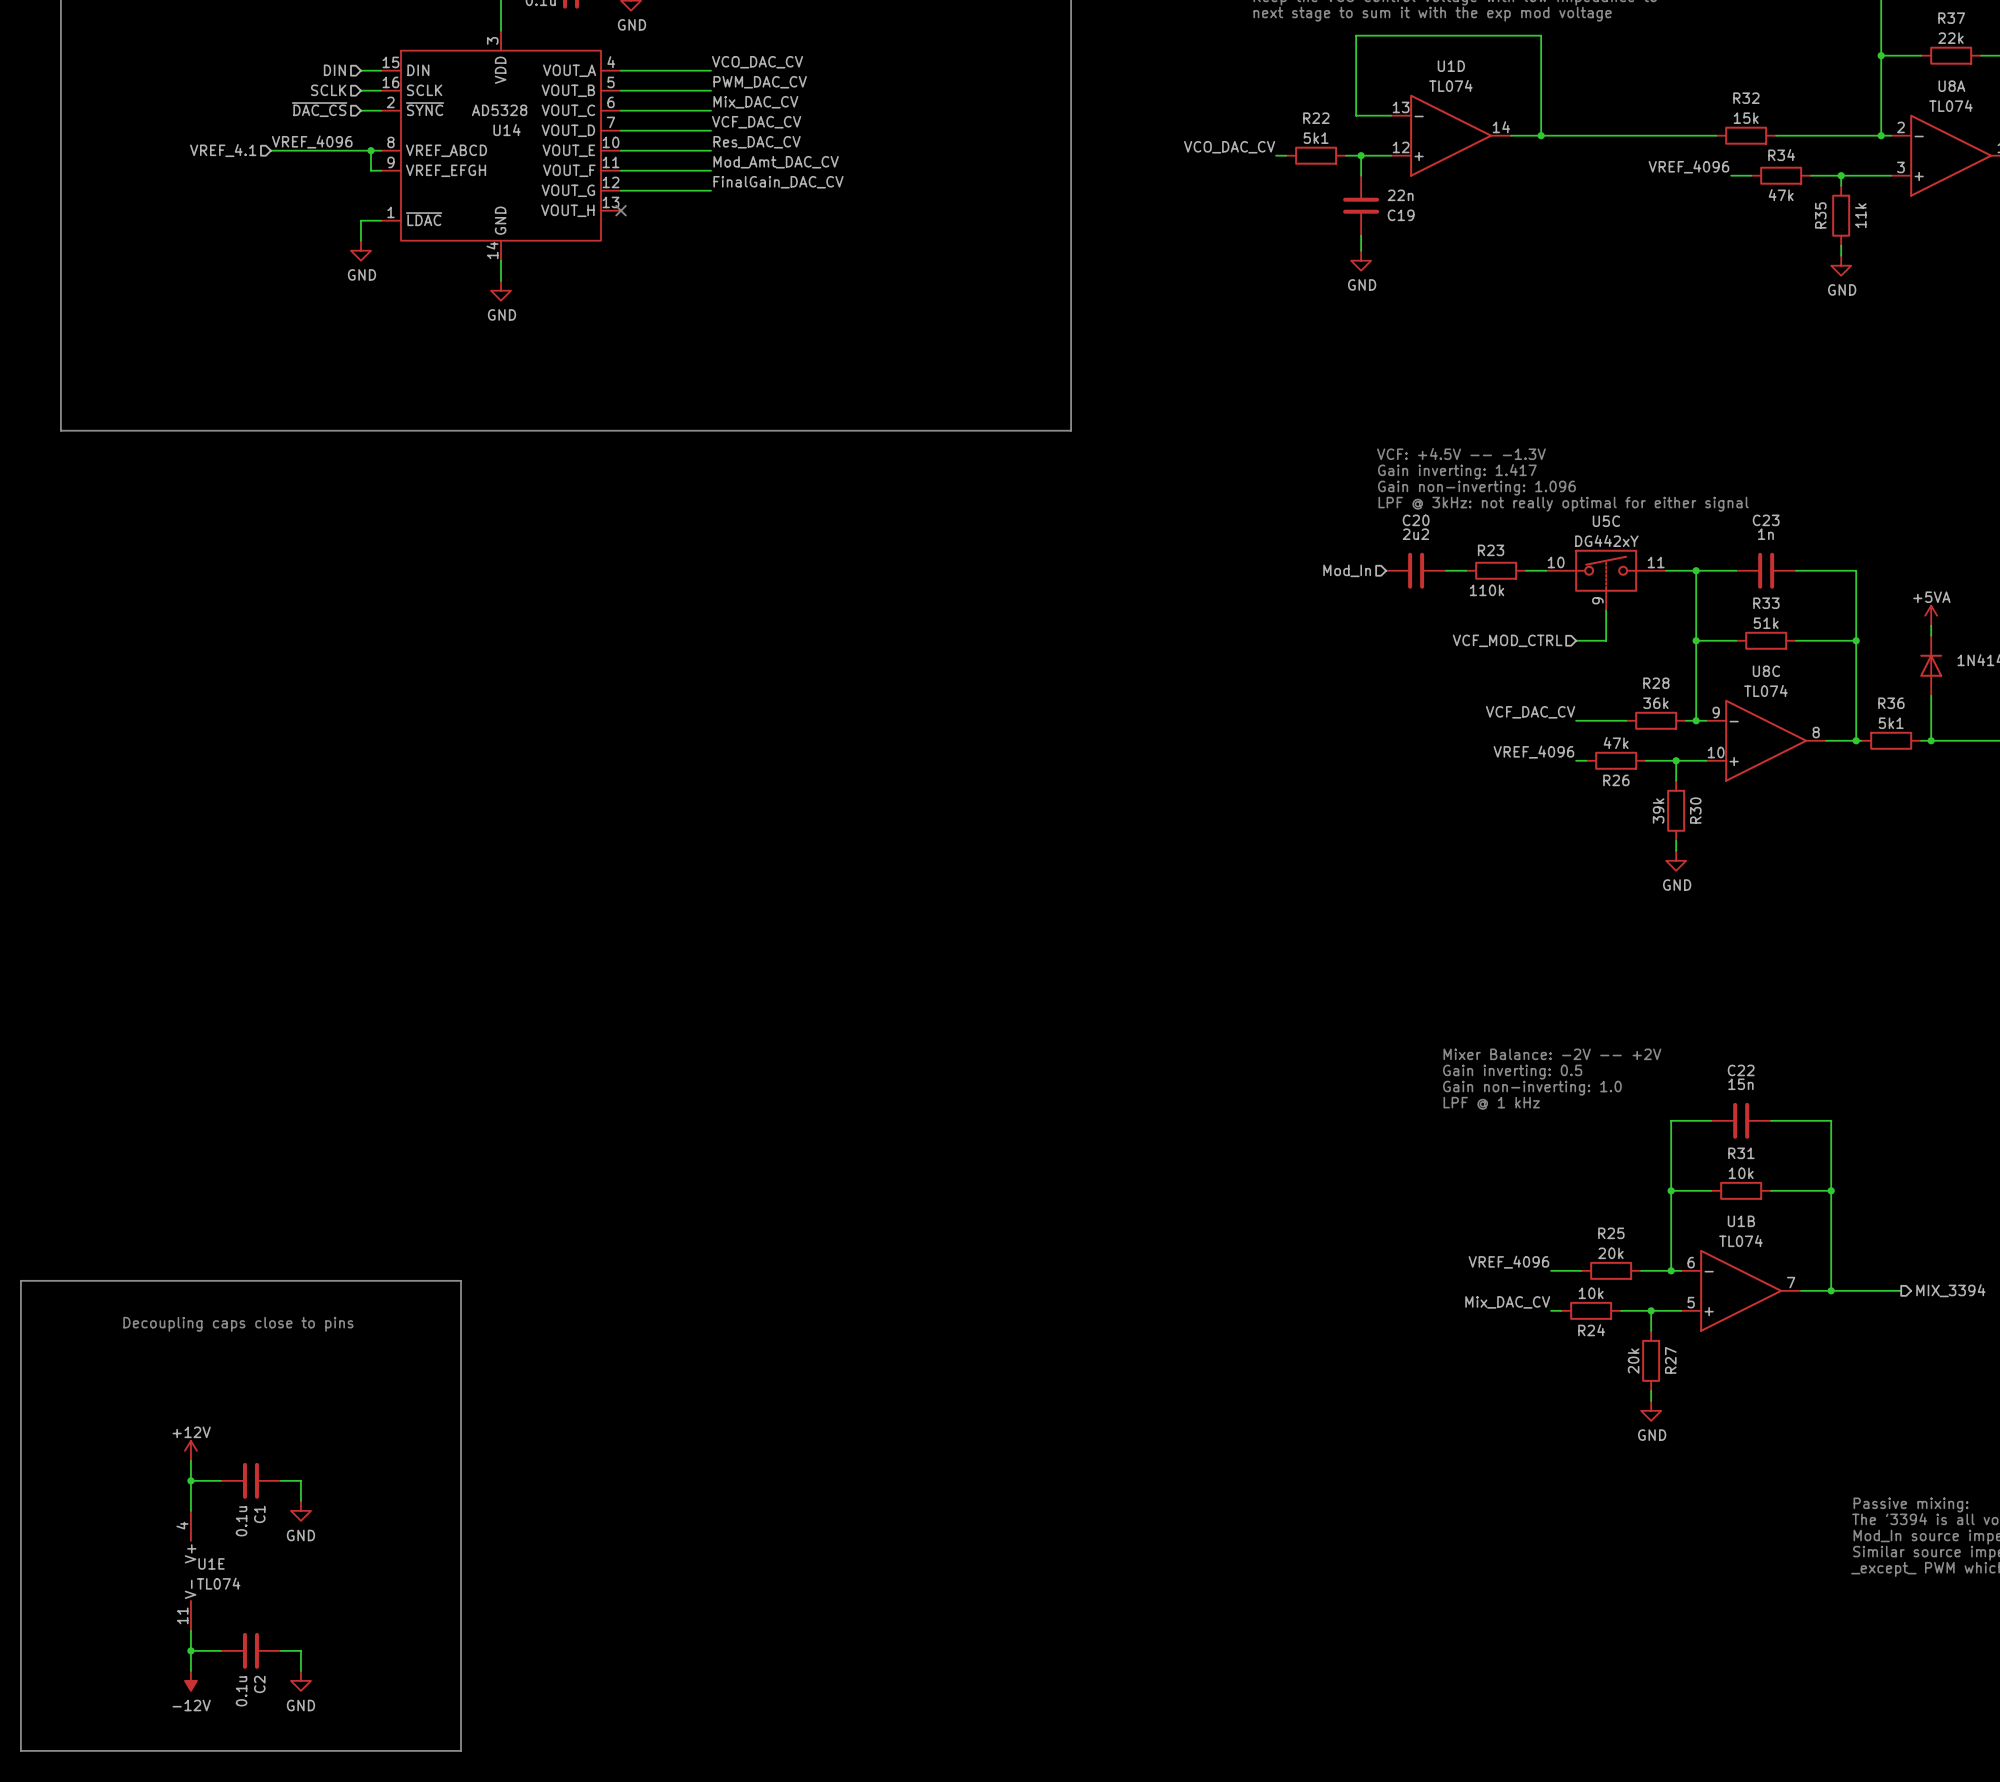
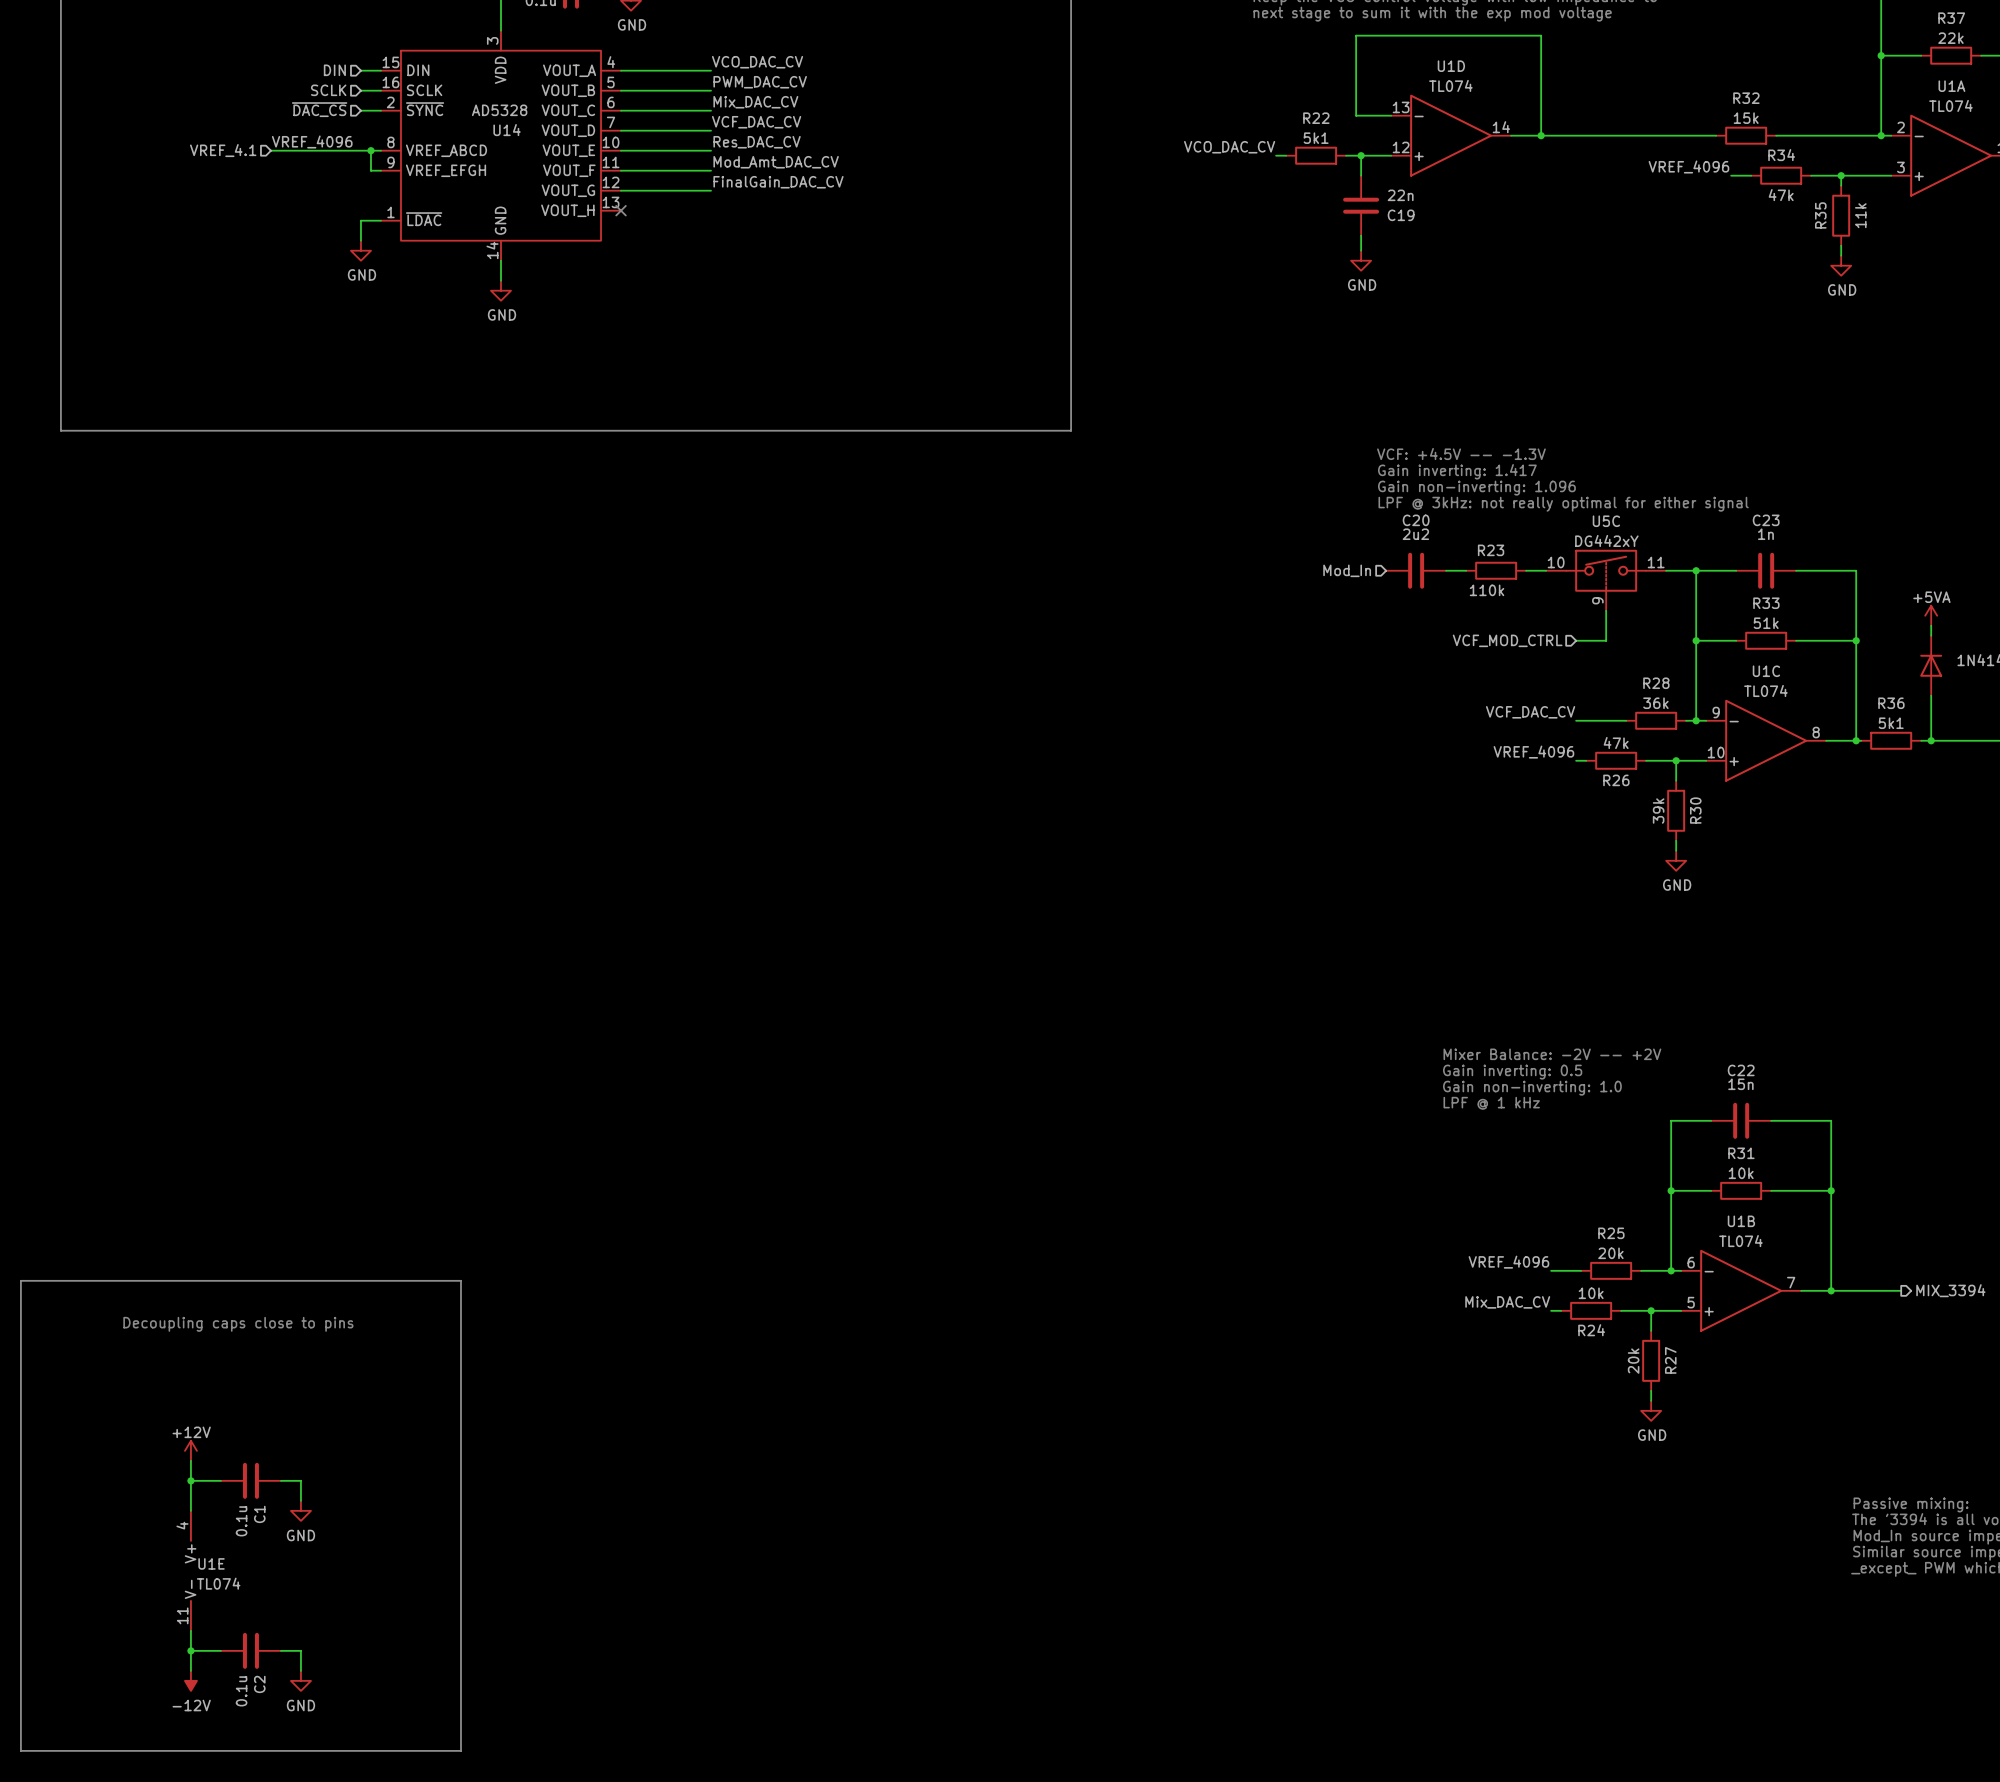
U8A name: U8A (1951, 86) -> U1A (1951, 86)
U8C name: U8C (1766, 671) -> U1C (1766, 671)

